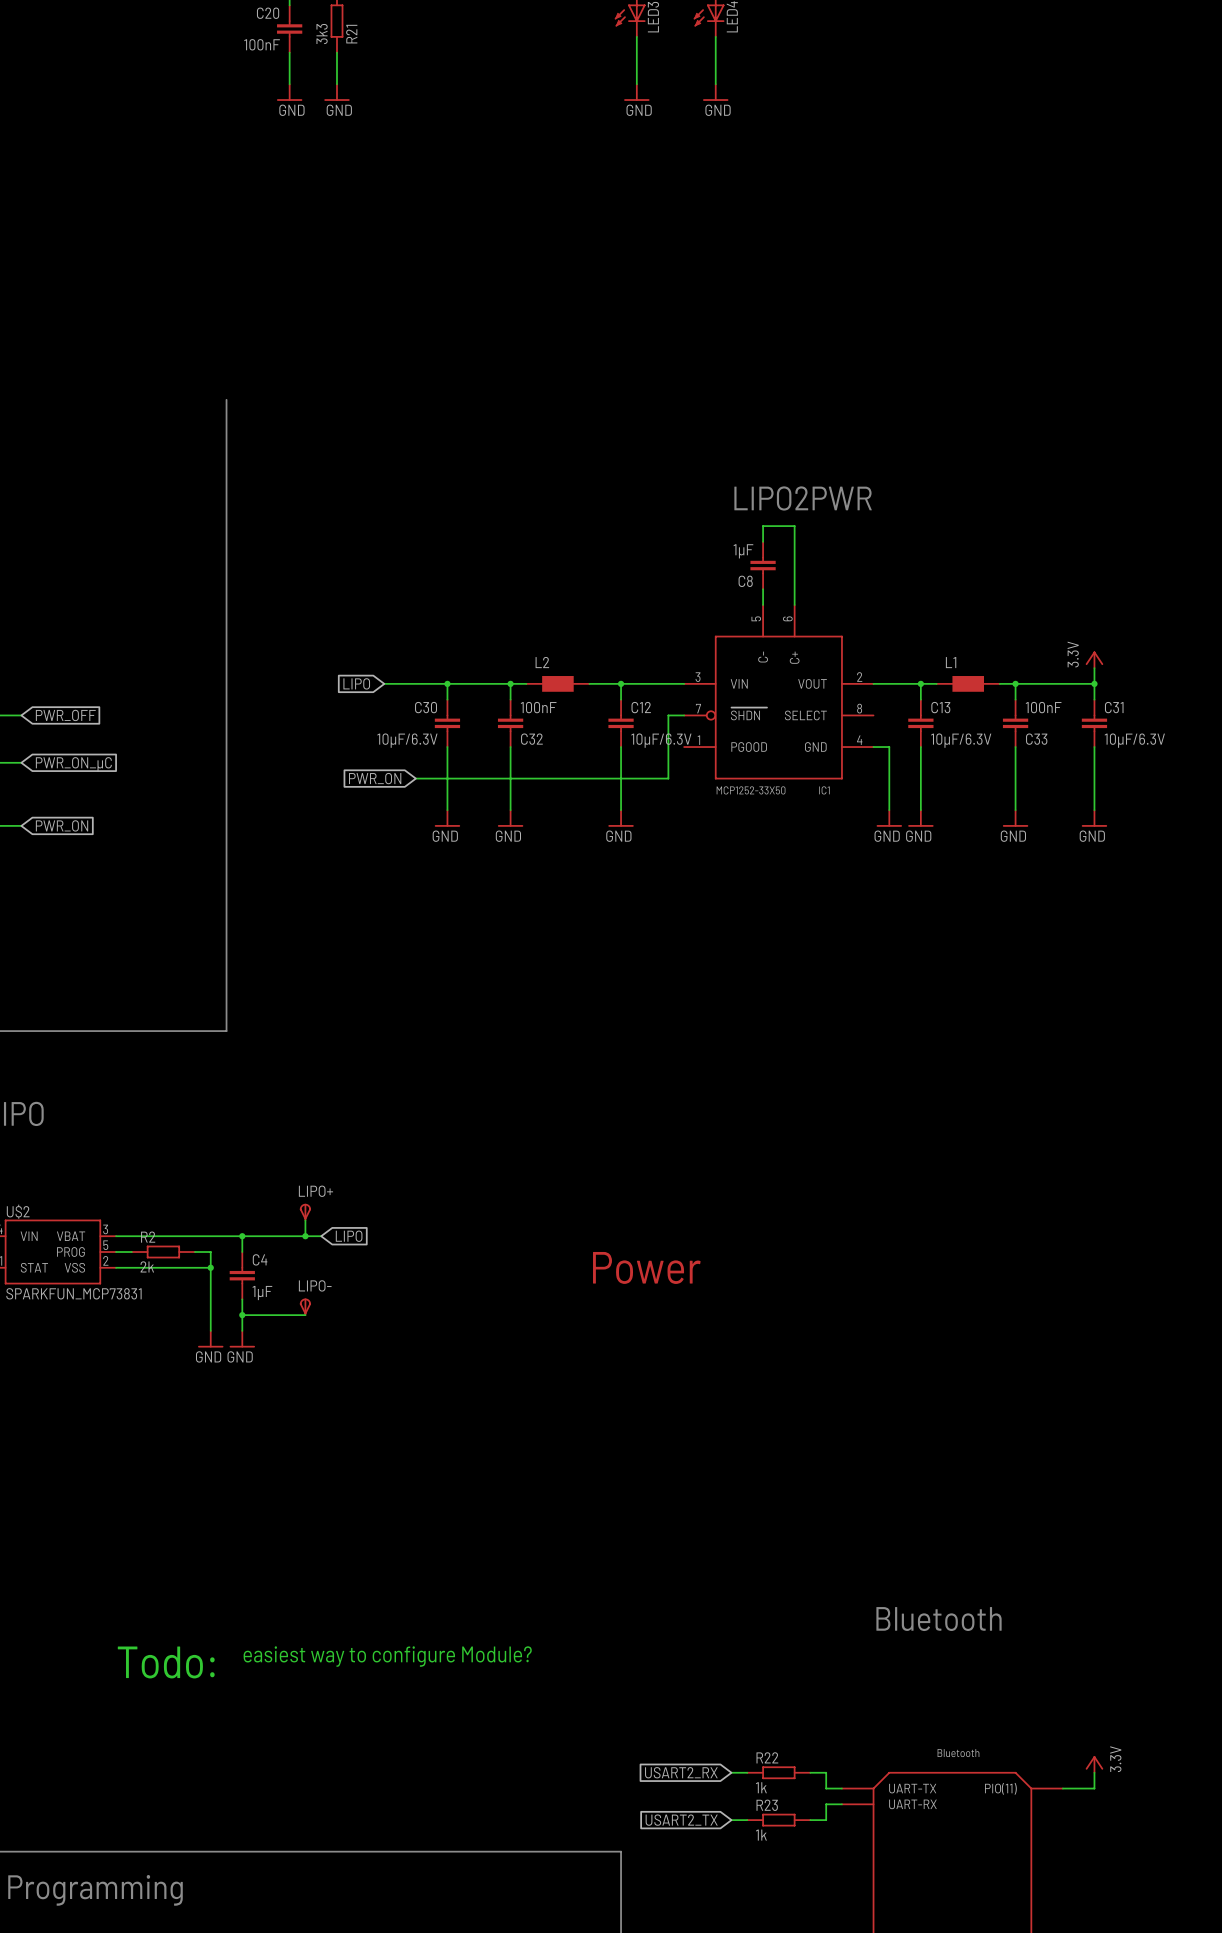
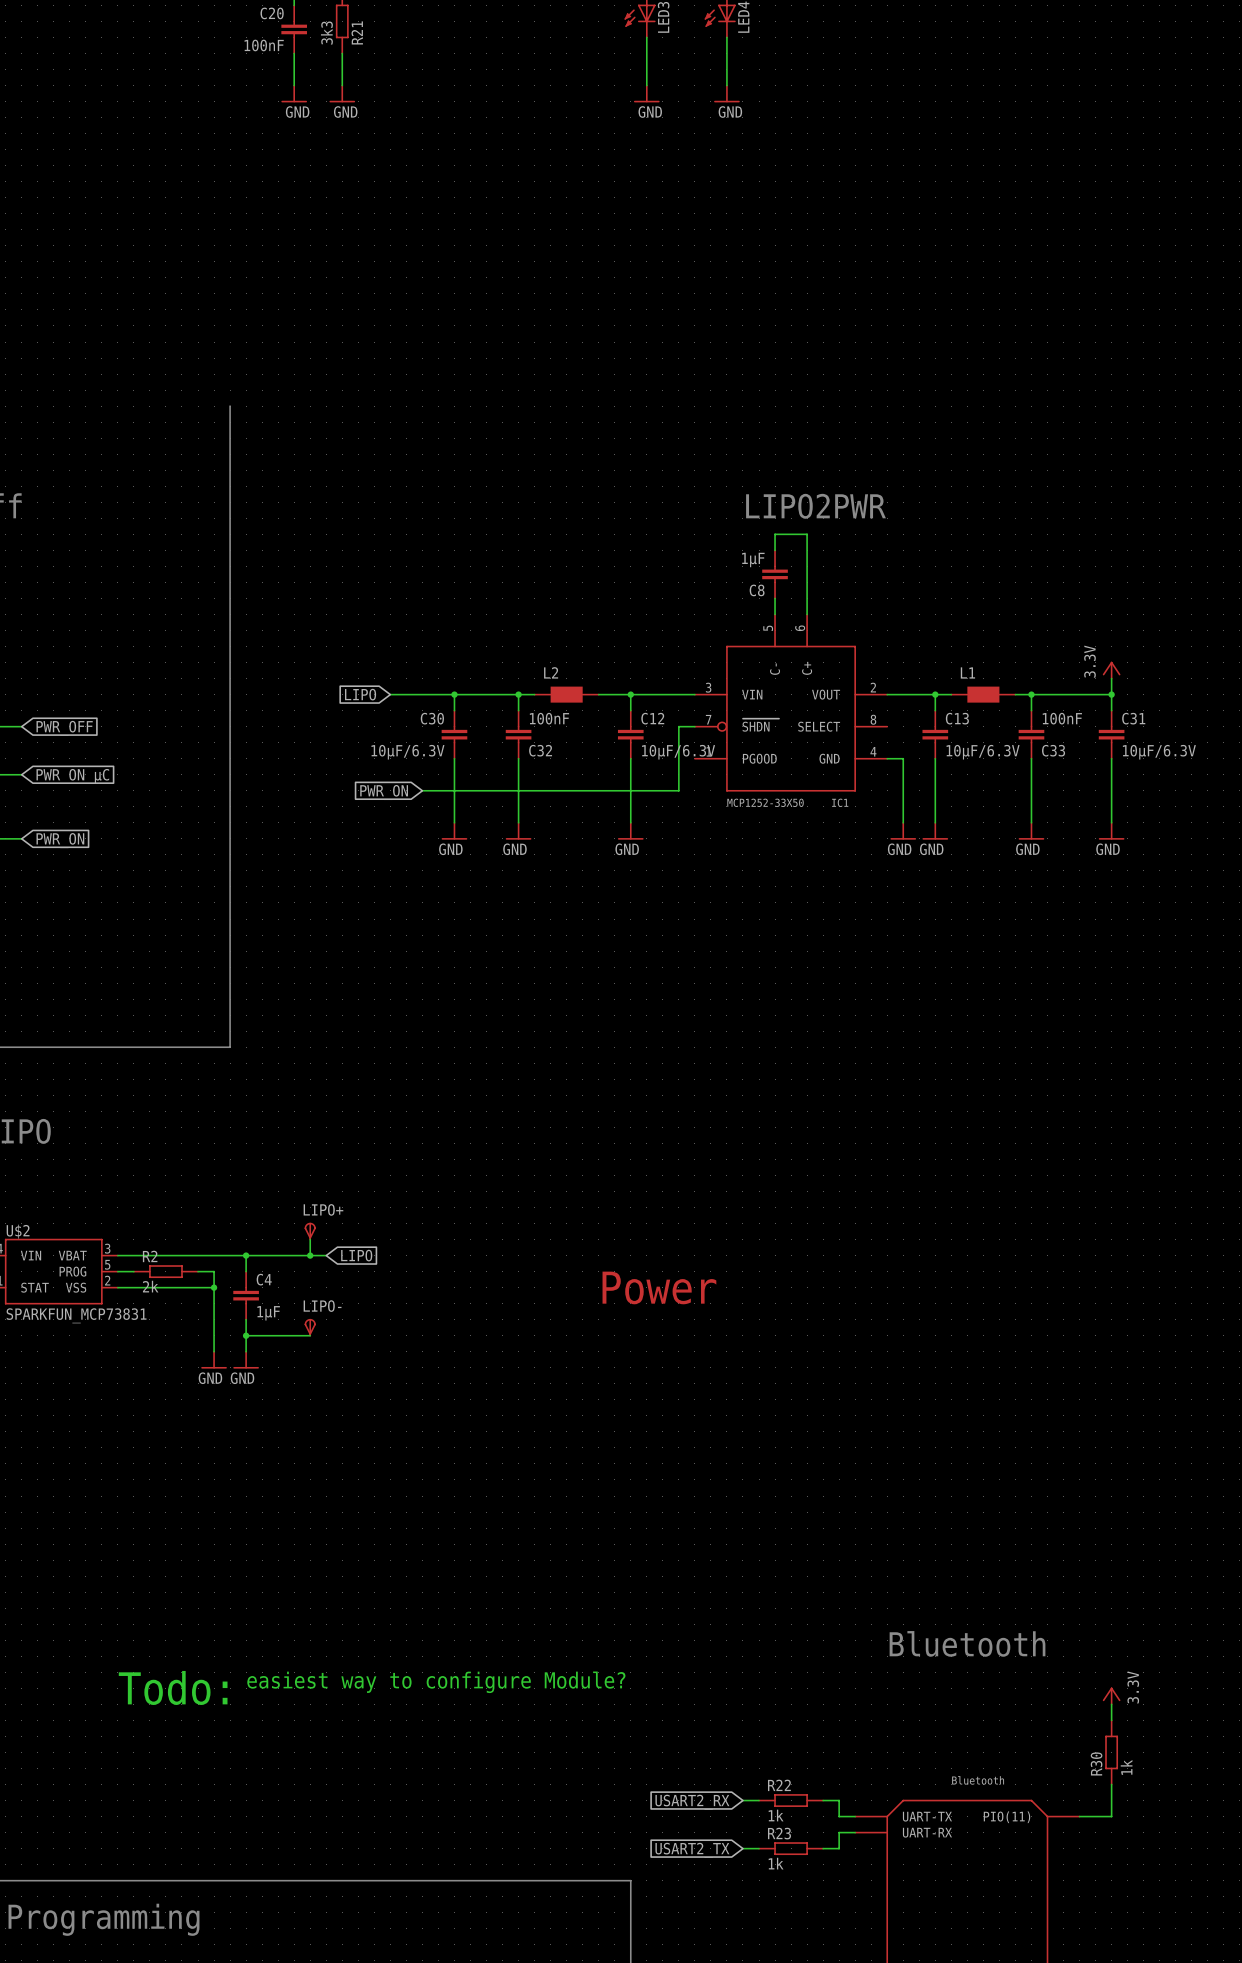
wire: none -> (1111, 1704) (1111, 1720)
R30: none -> 1k (1111, 1752)
power symbol position: 3.3V (1094, 1764) -> 3.3V (1111, 1695)

